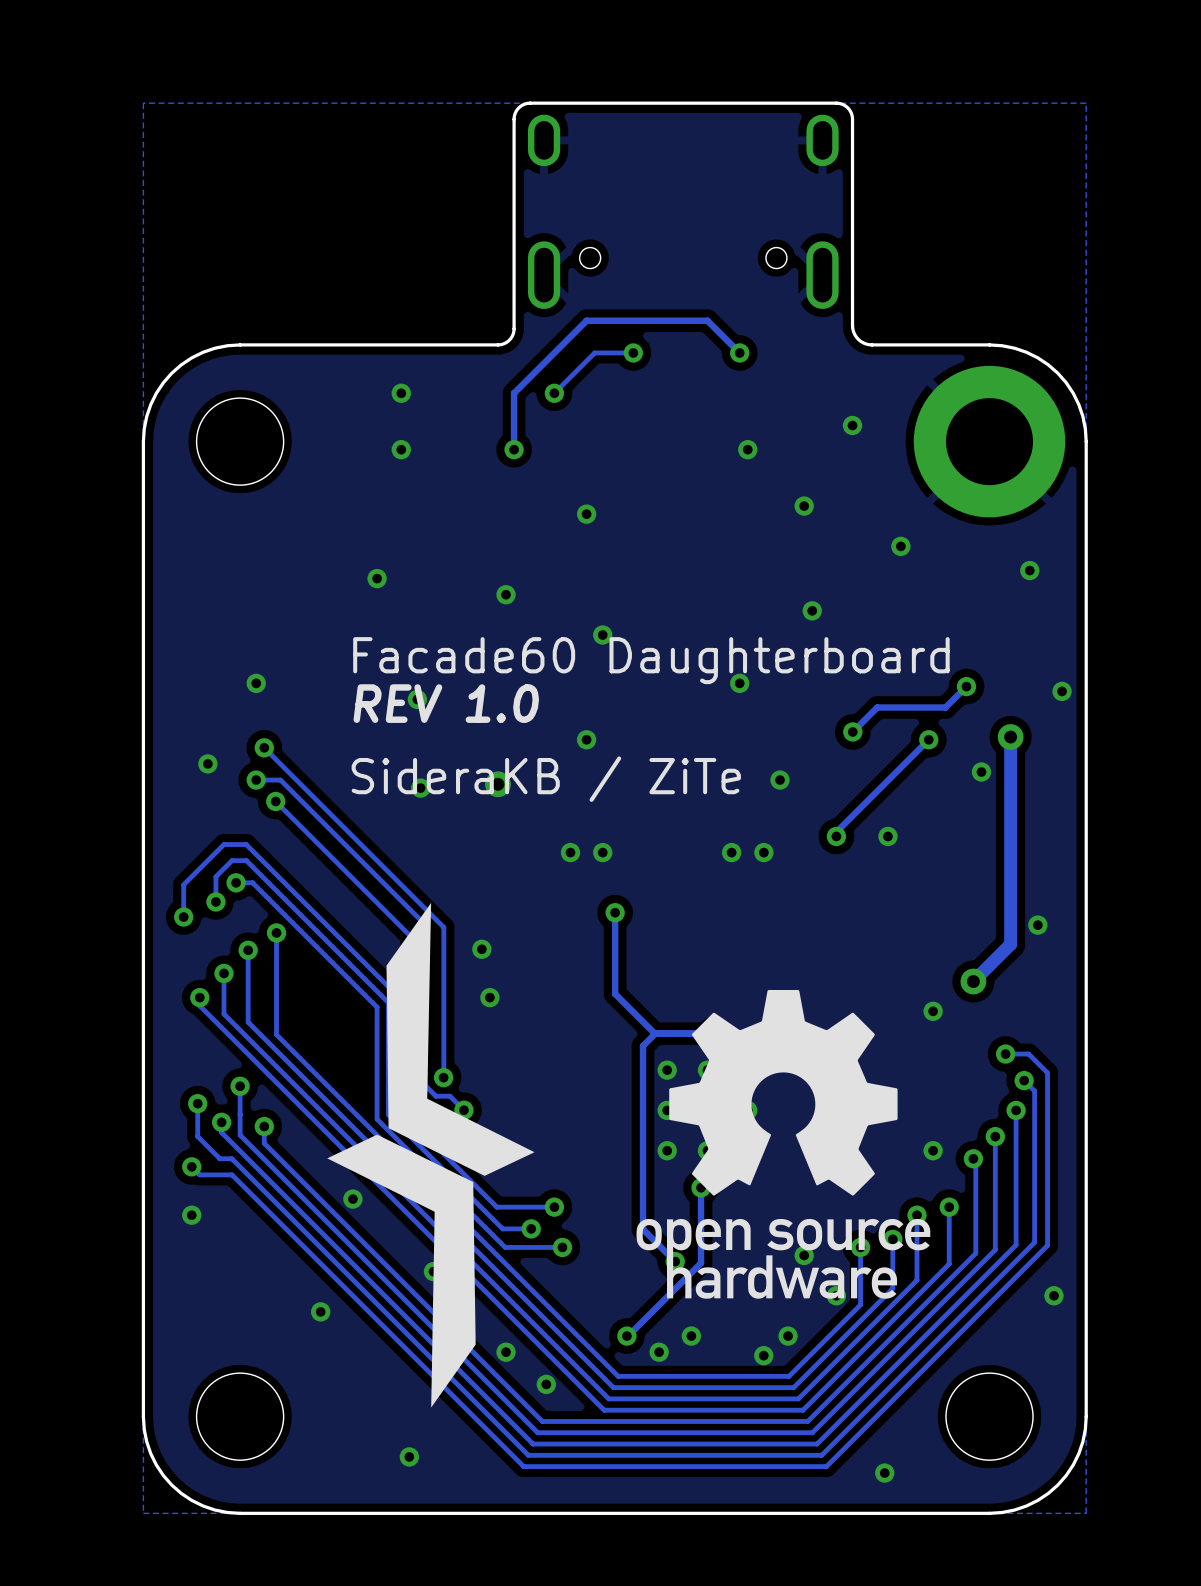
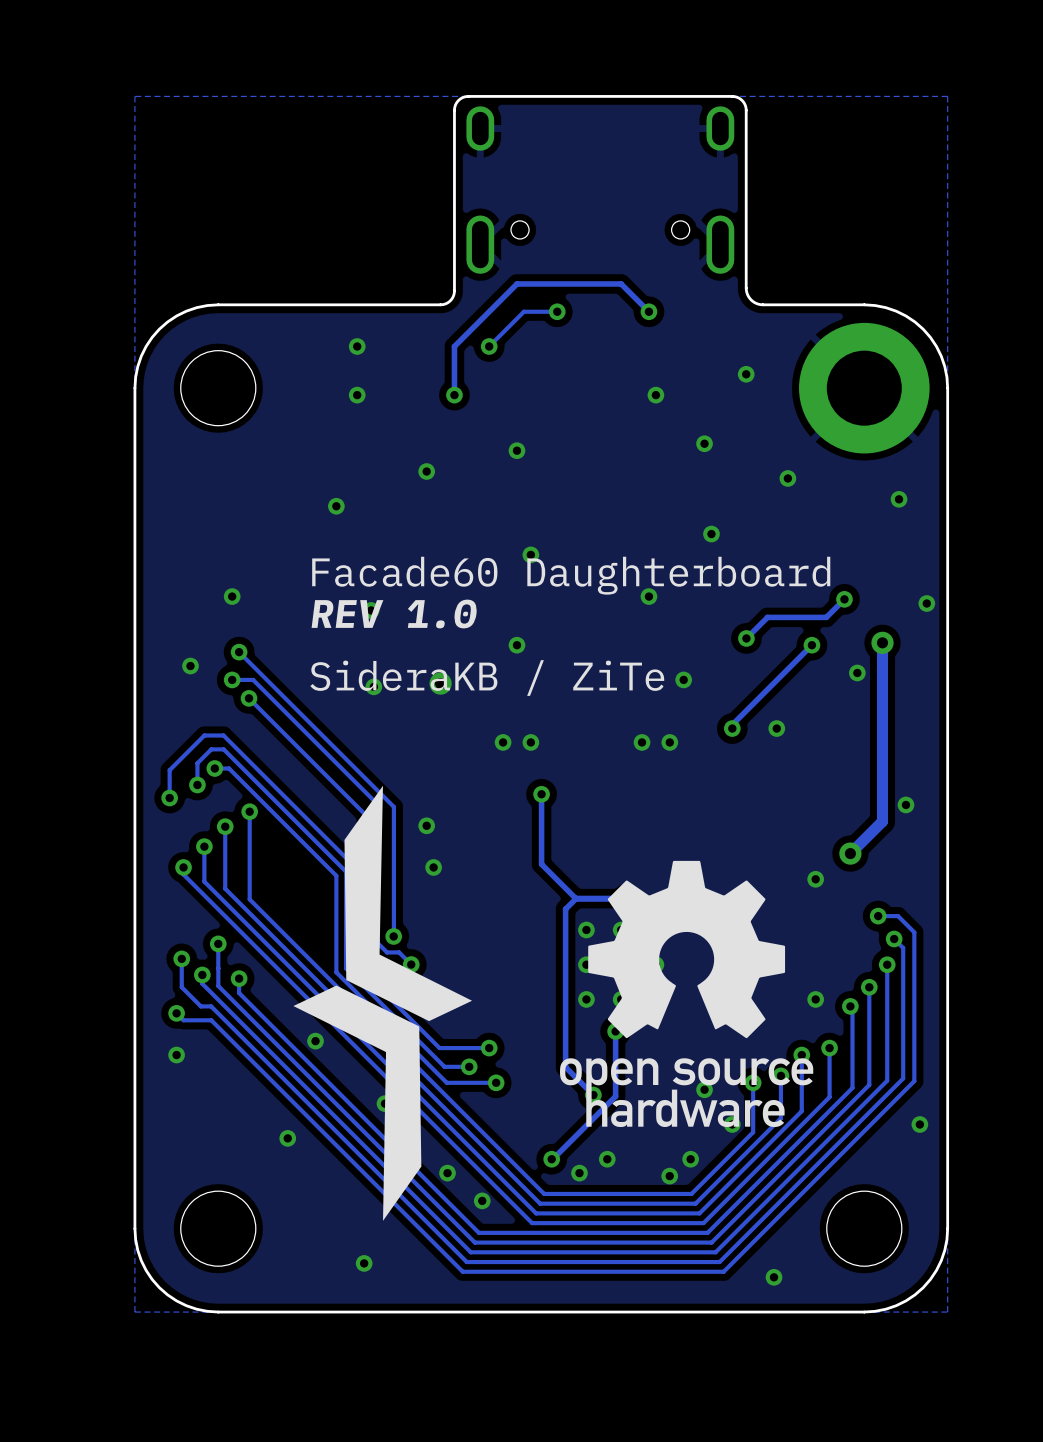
via position: (506, 594) -> (426, 471)

